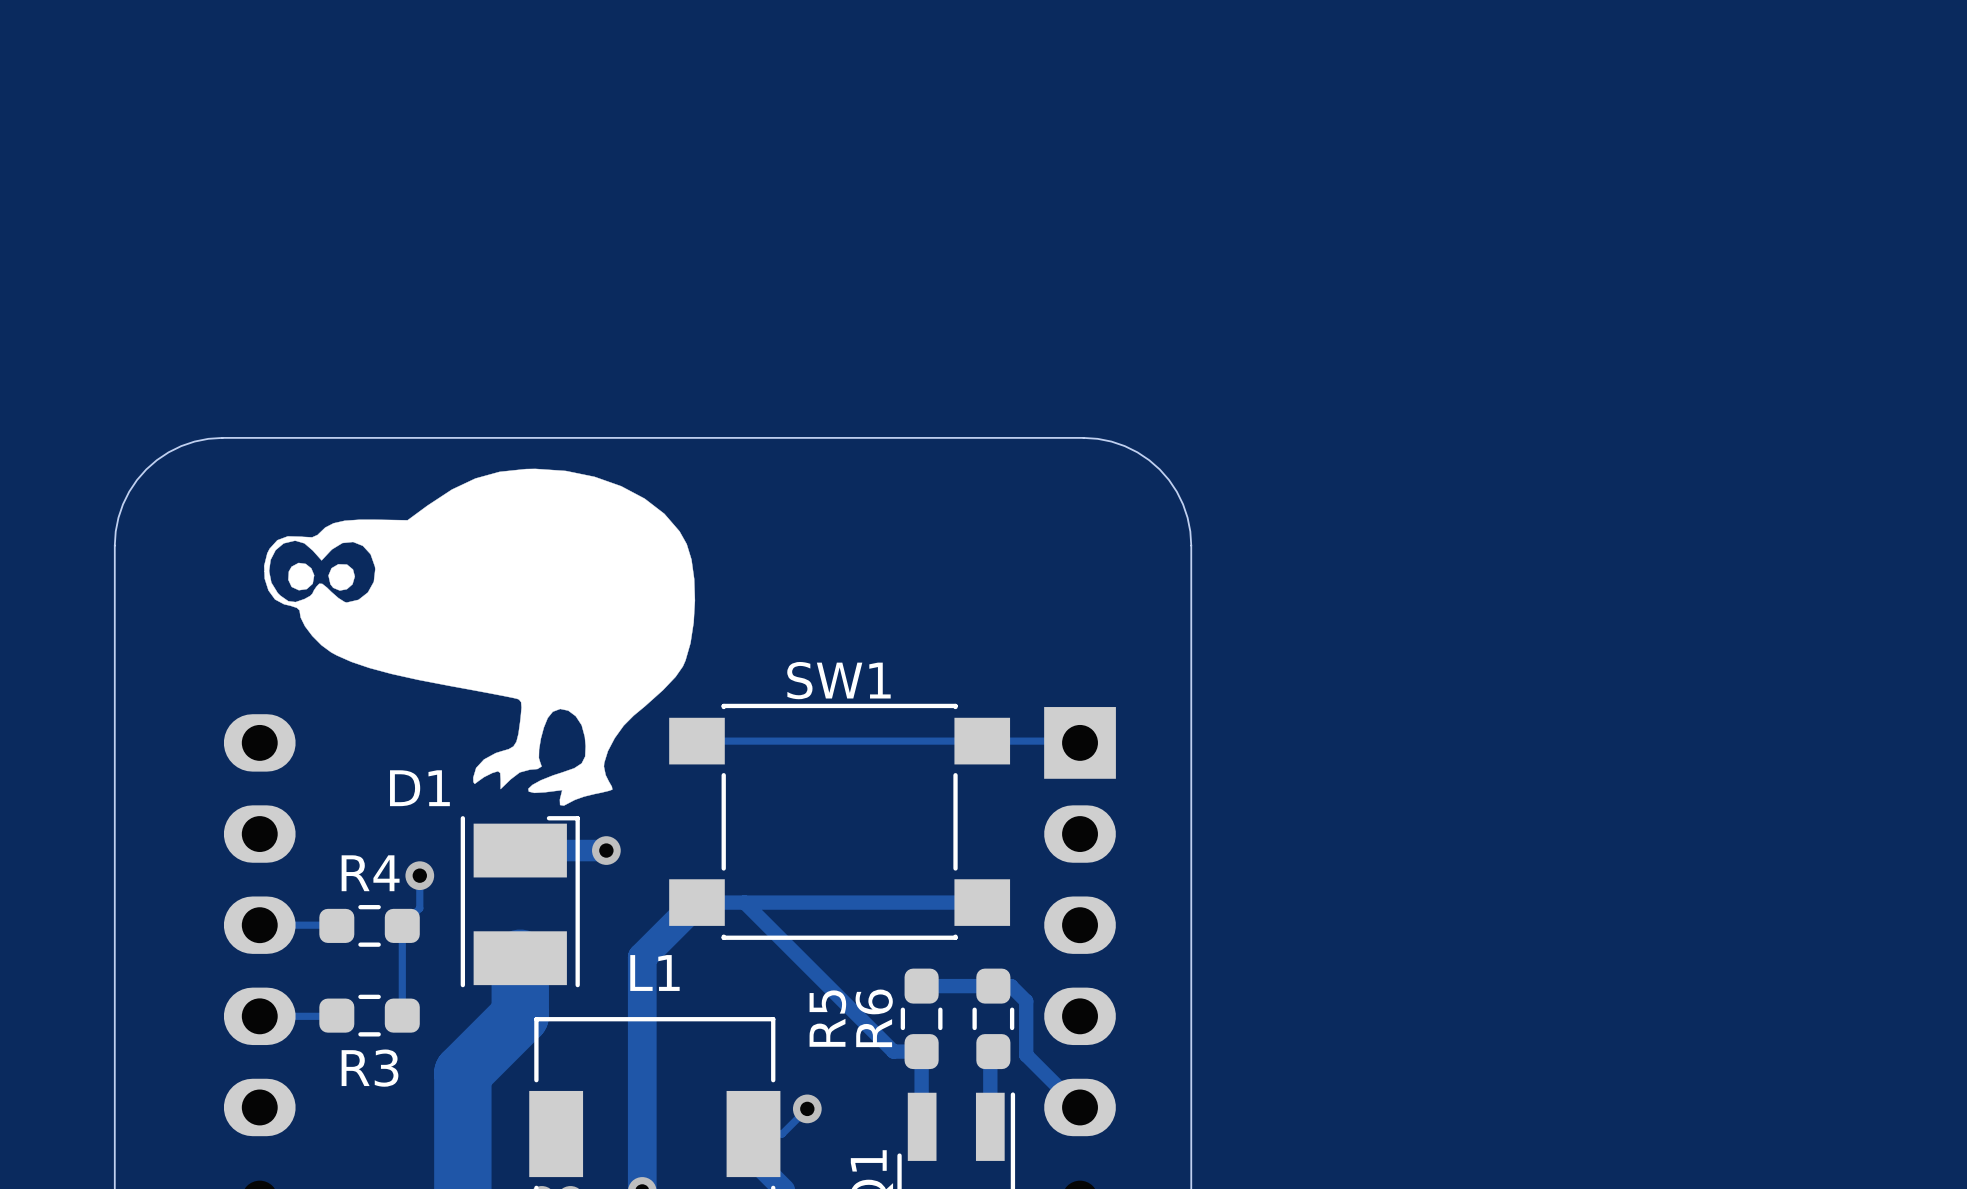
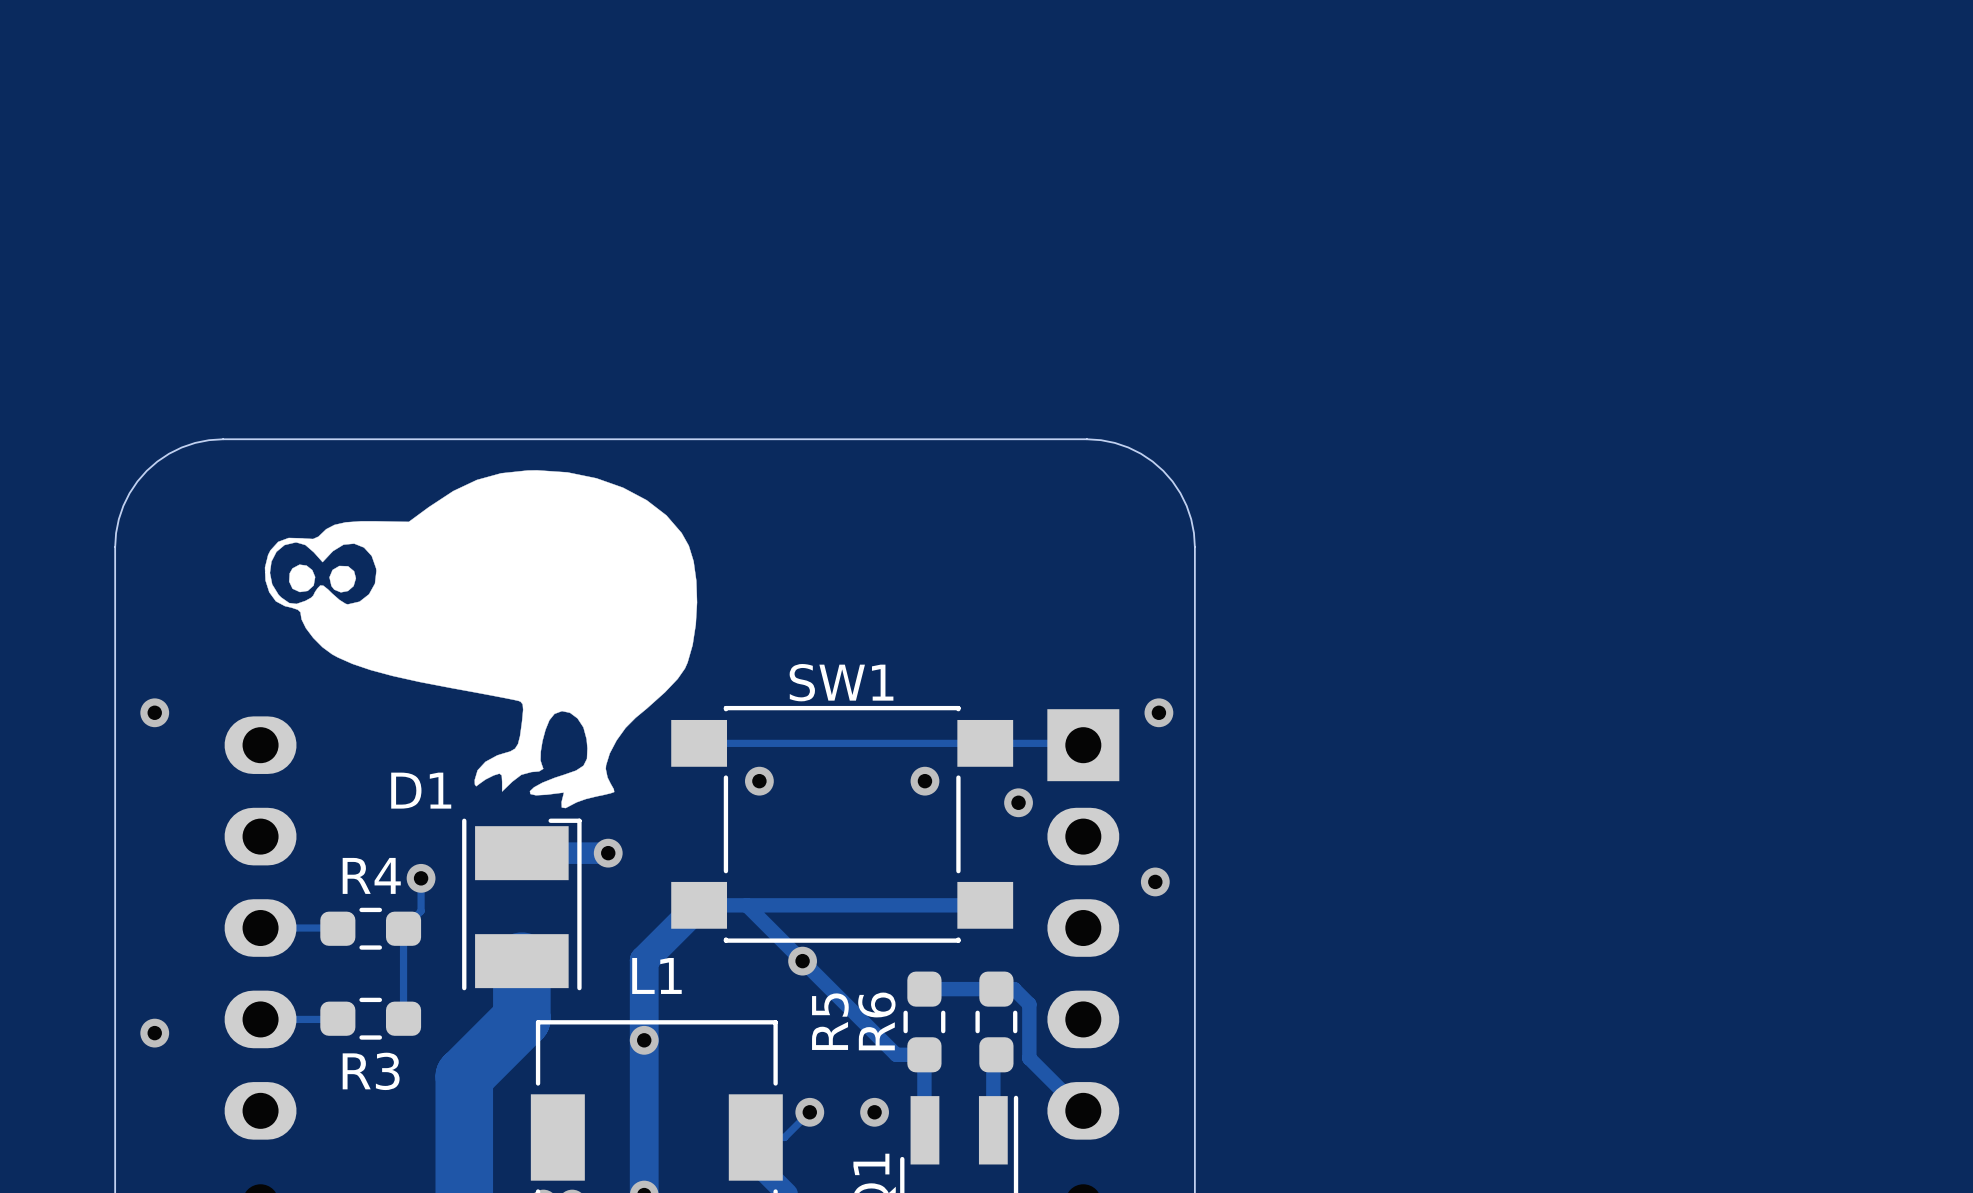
via: none -> (154, 712)
via: none -> (1158, 712)
via: none -> (759, 781)
via: none -> (924, 781)
via: none -> (1018, 802)
via: none -> (1155, 881)
via: none -> (802, 961)
via: none -> (154, 1033)
via: none -> (644, 1040)
via: none -> (874, 1112)

